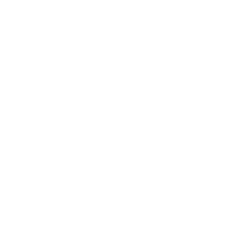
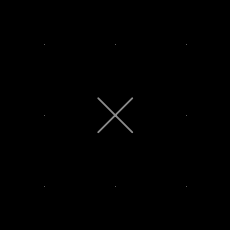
no-connect mark: none -> (115, 115)

